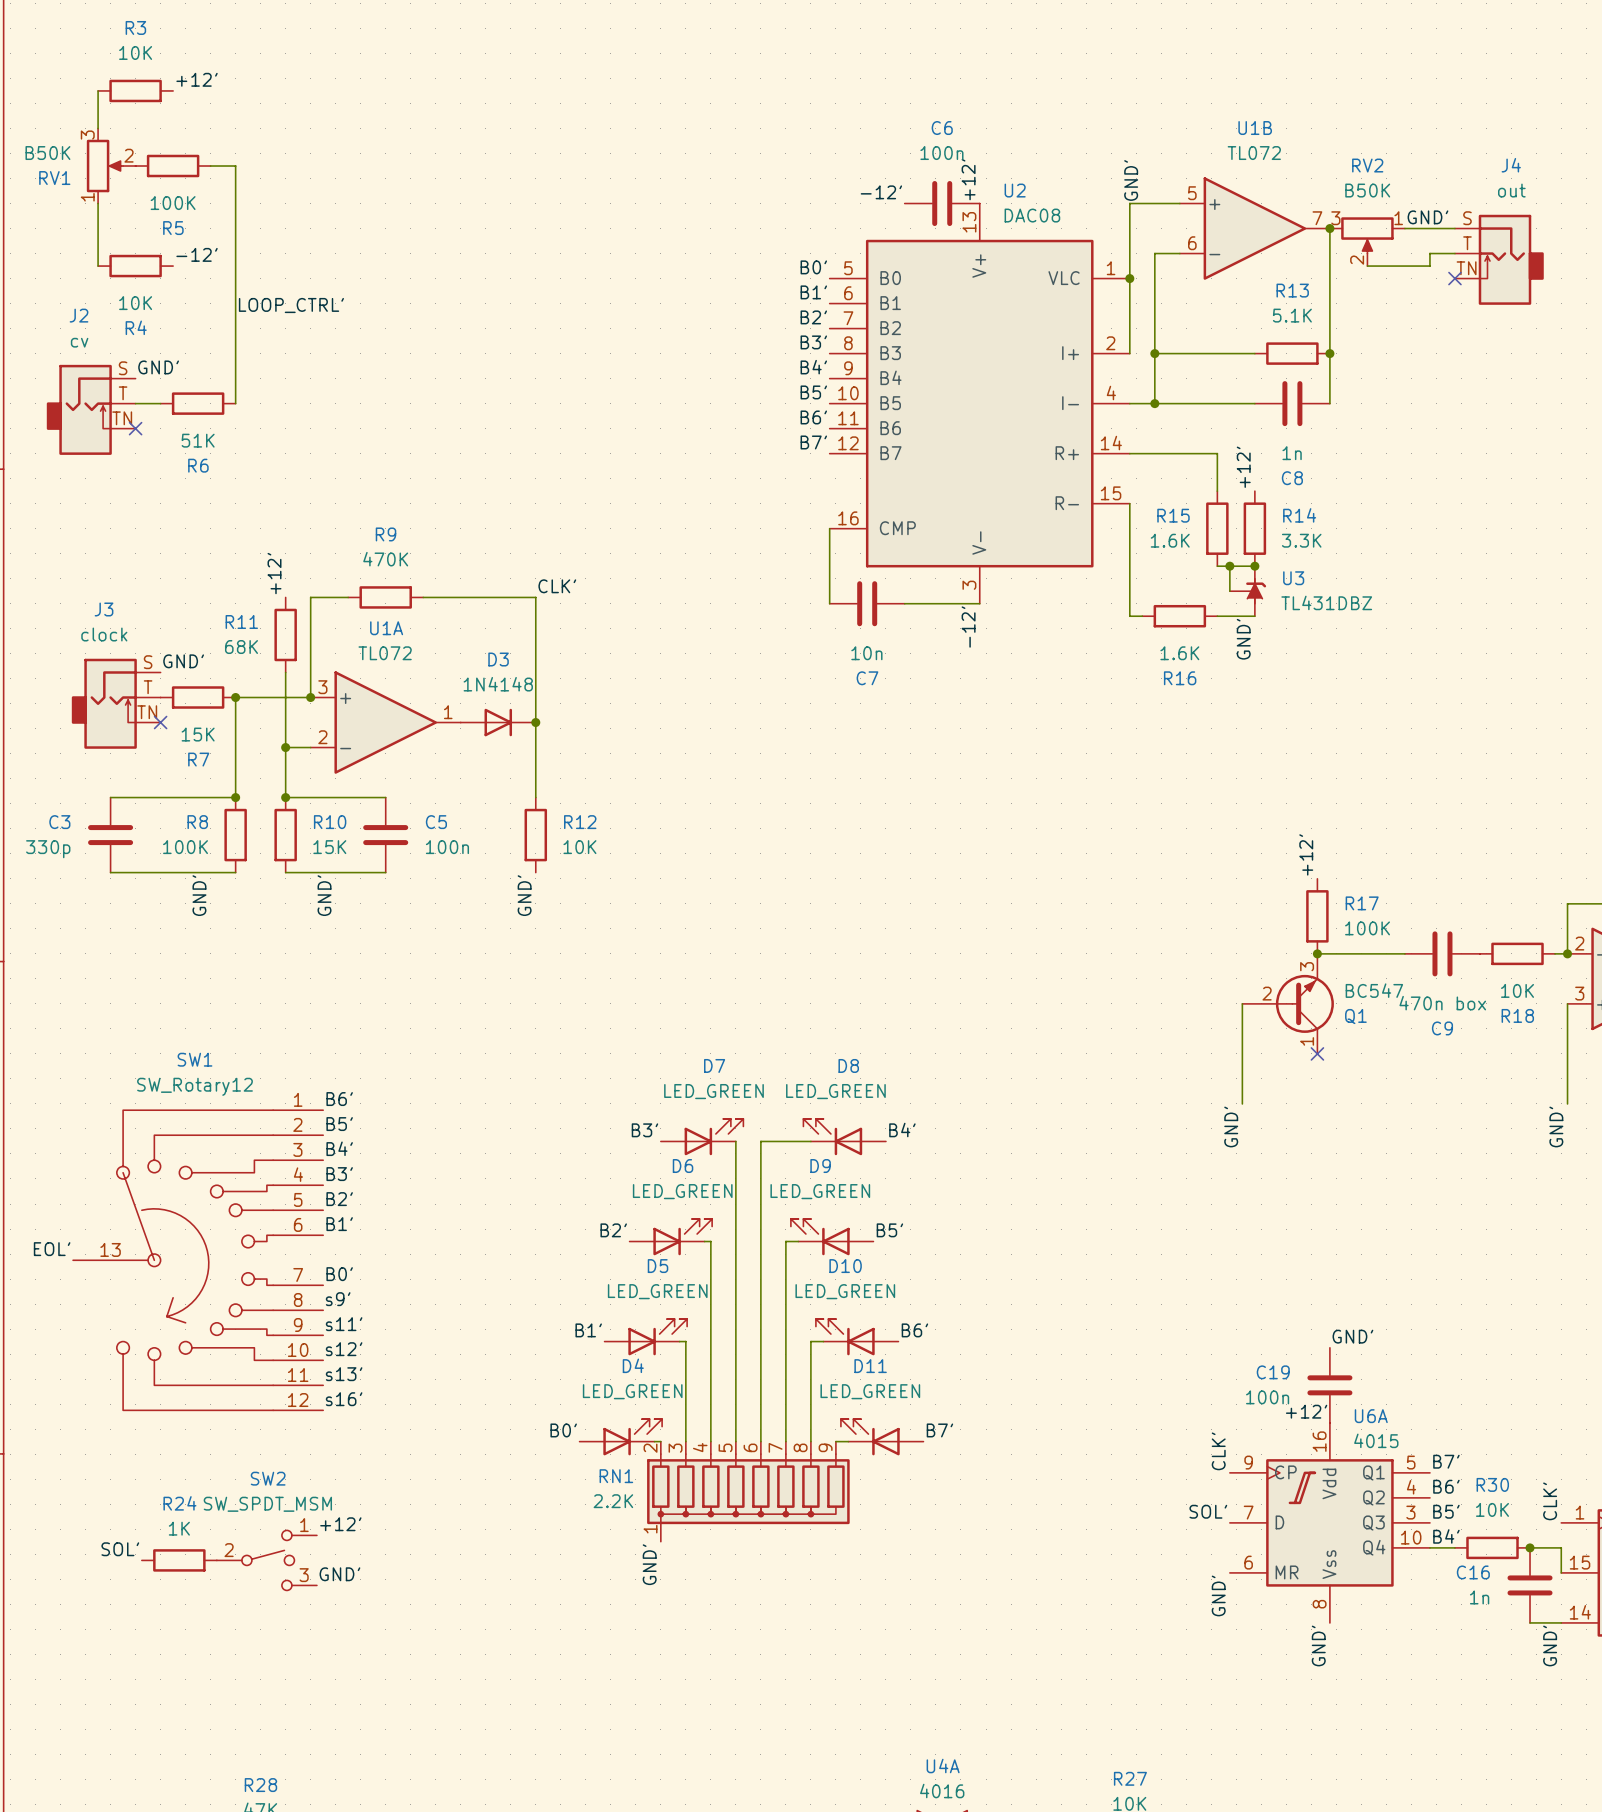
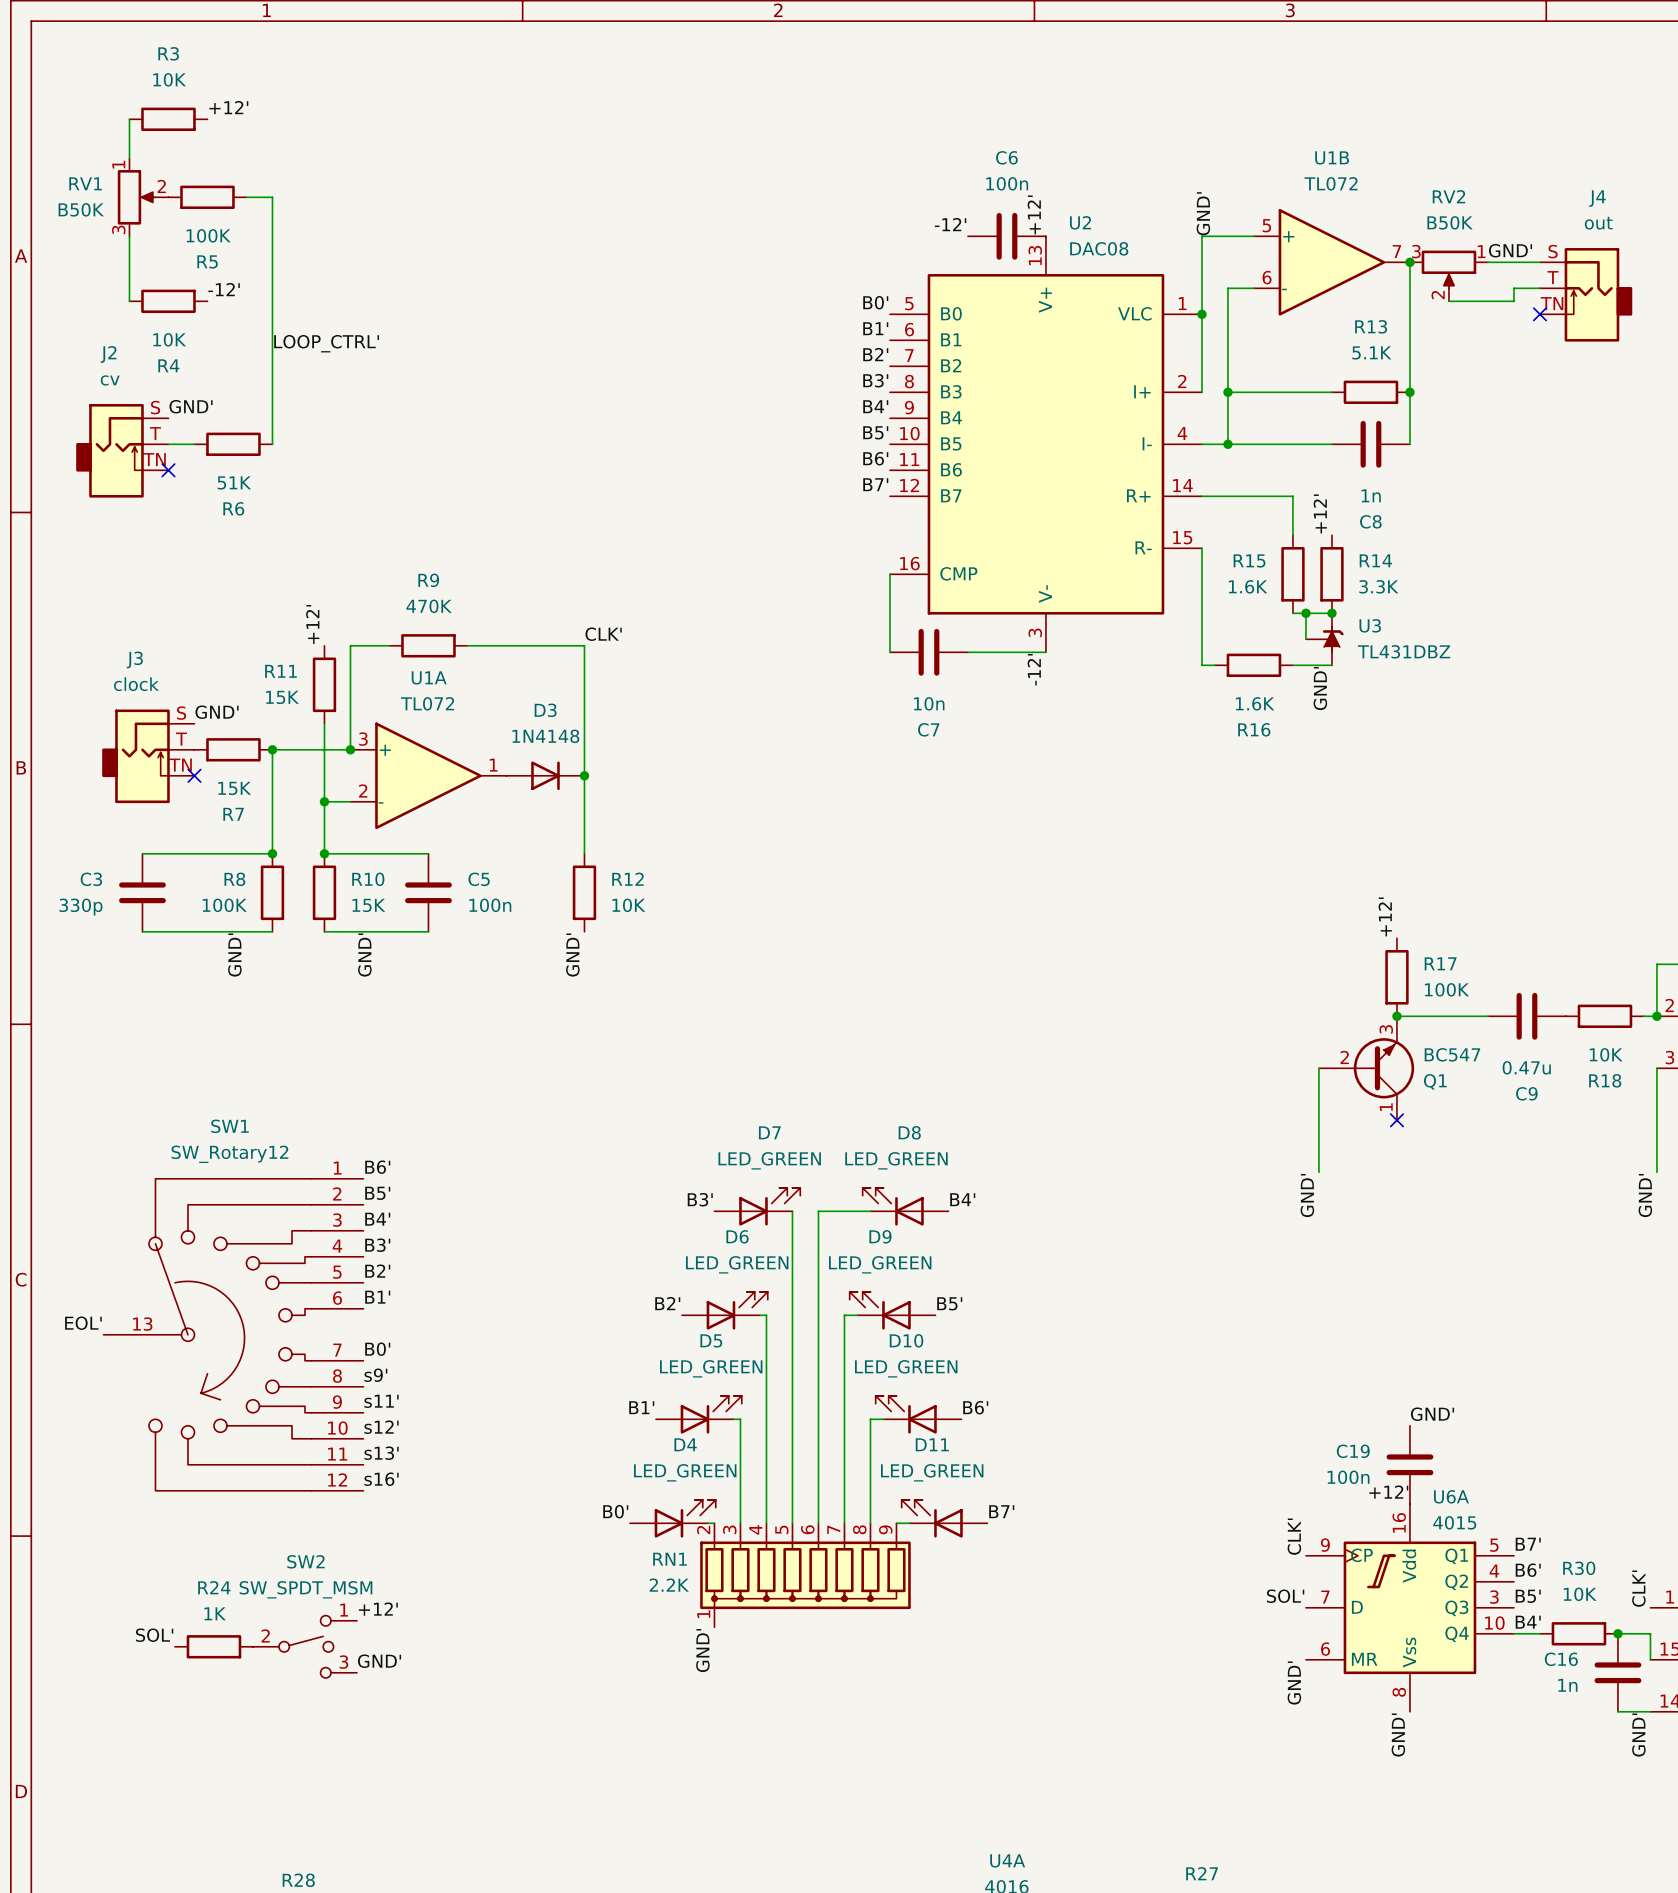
RV1 flip: as is (104, 166) -> up-down (136, 197)
R11 value: 68K (241, 647) -> 15K (282, 697)
C9 value: 470n box (1442, 1003) -> 0.47u (1526, 1067)

